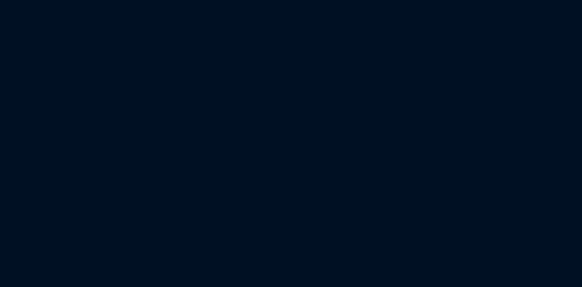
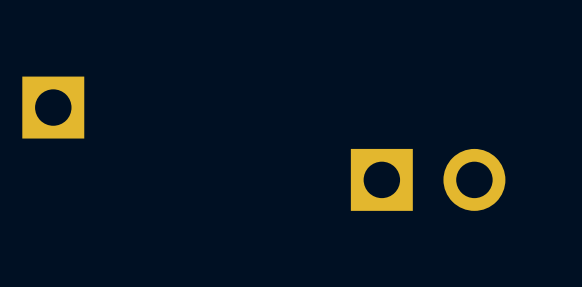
part: none -> (53, 107)
part: none -> (428, 179)

